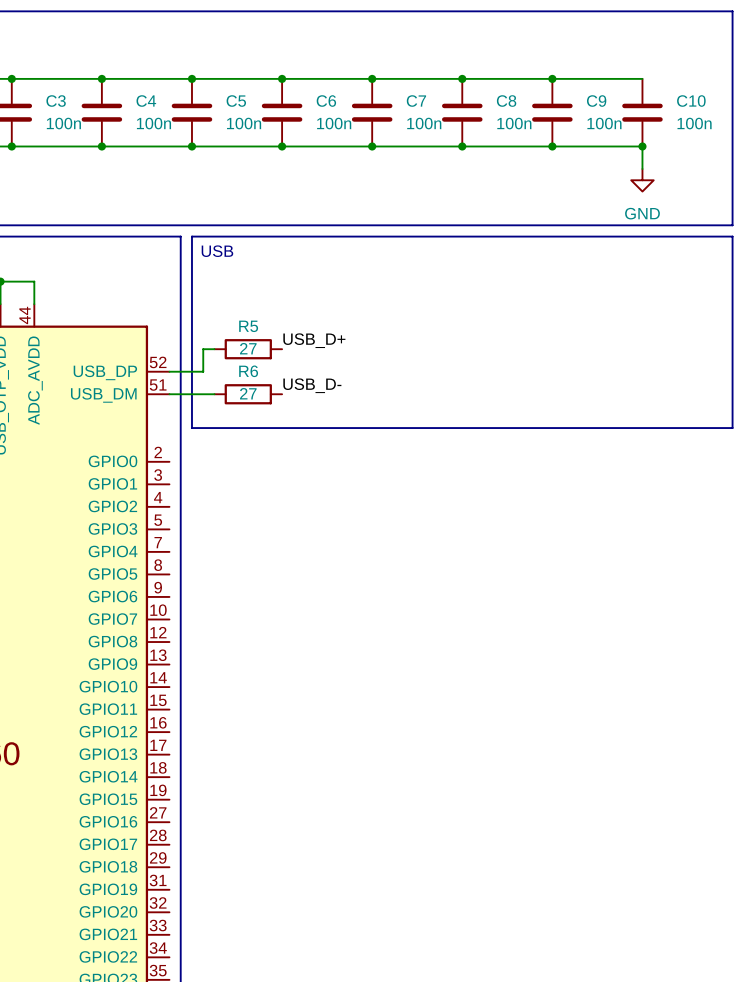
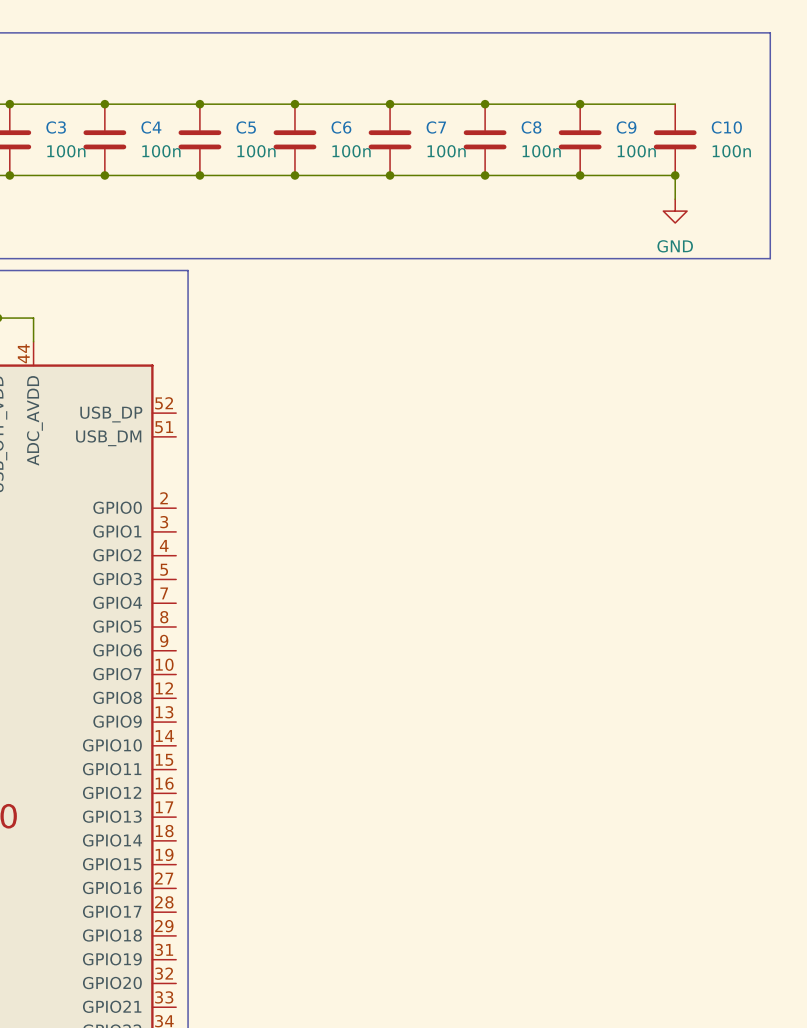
line: (191, 236) (732, 236) (732, 428) (191, 428) (191, 236) -> none
text: USB (217, 251) -> none
label: USB_D+ (314, 340) -> none
wire: (214, 349) (203, 349) (203, 371) (169, 371) -> none
R5: 27 (248, 349) -> none
label: USB_D- (312, 385) -> none
wire: (169, 394) (214, 394) -> none
R6: 27 (248, 394) -> none

